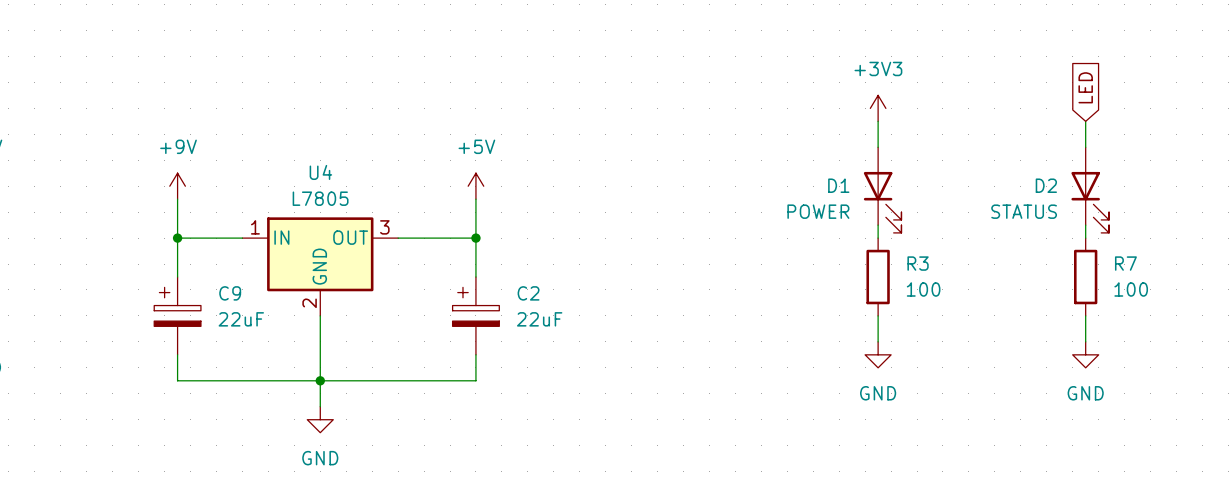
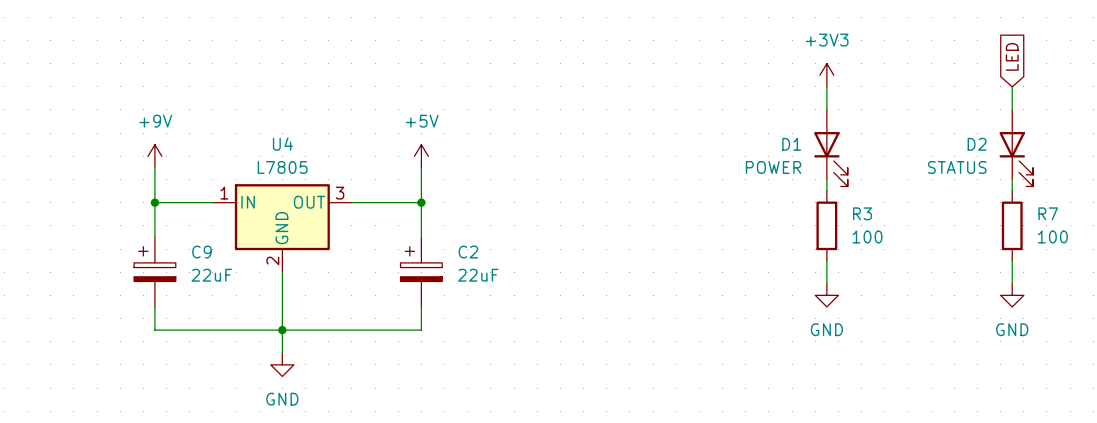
global label position: LED (1085, 87) -> LED (1012, 56)
power symbol position: +3V3 (878, 108) -> +3V3 (826, 75)
wire: (878, 121) (878, 147) -> (826, 86) (826, 109)
wire: (1085, 121) (1085, 147) -> (1012, 86) (1012, 109)
D1 position: (882, 190) -> (830, 148)
D2 position: (1090, 190) -> (1016, 148)
wire: (878, 225) (878, 238) -> (826, 179) (826, 191)
wire: (1085, 225) (1085, 238) -> (1012, 179) (1012, 191)
R3 position: (878, 277) -> (826, 225)
R7 position: (1085, 277) -> (1012, 225)
wire: (878, 315) (878, 341) -> (826, 260) (826, 283)
wire: (1085, 315) (1085, 341) -> (1012, 260) (1012, 283)
power symbol position: GND (878, 354) -> GND (826, 295)
power symbol position: GND (1085, 354) -> GND (1012, 295)

